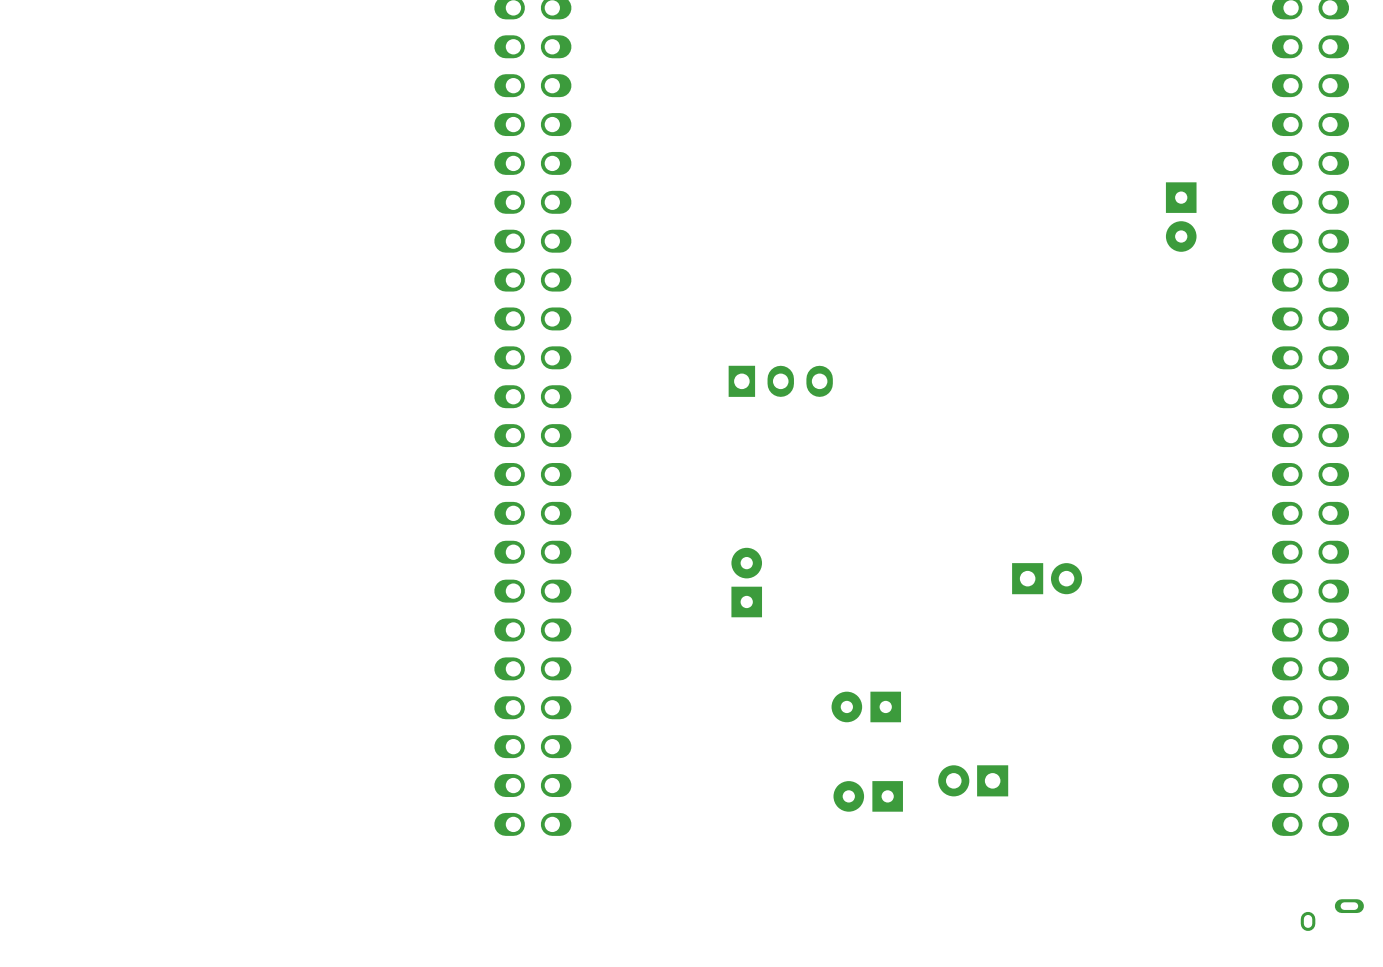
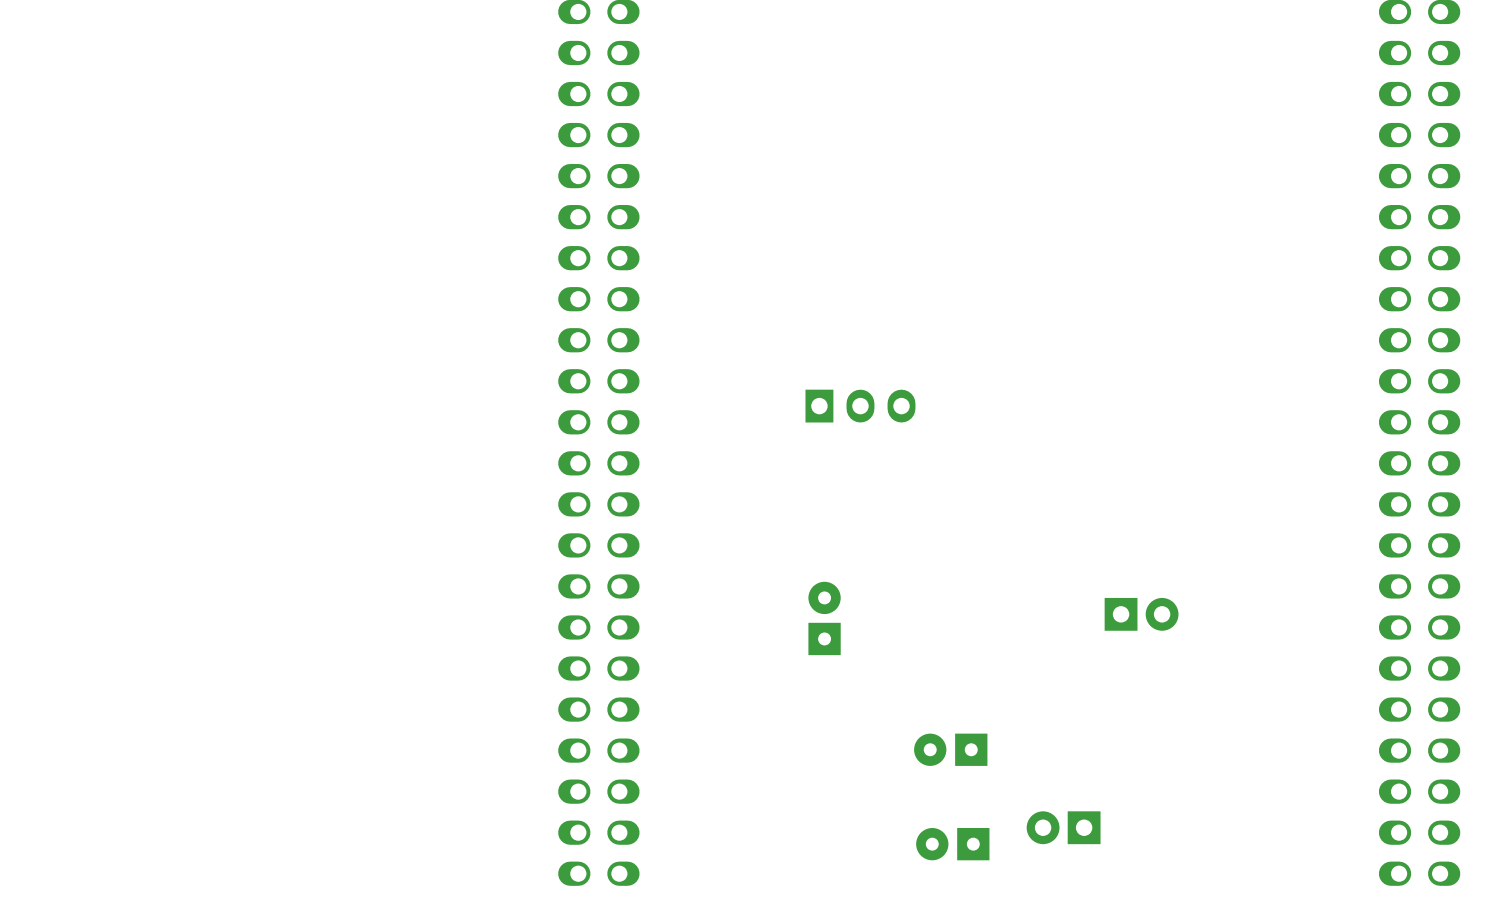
part: (1181, 217) -> none

